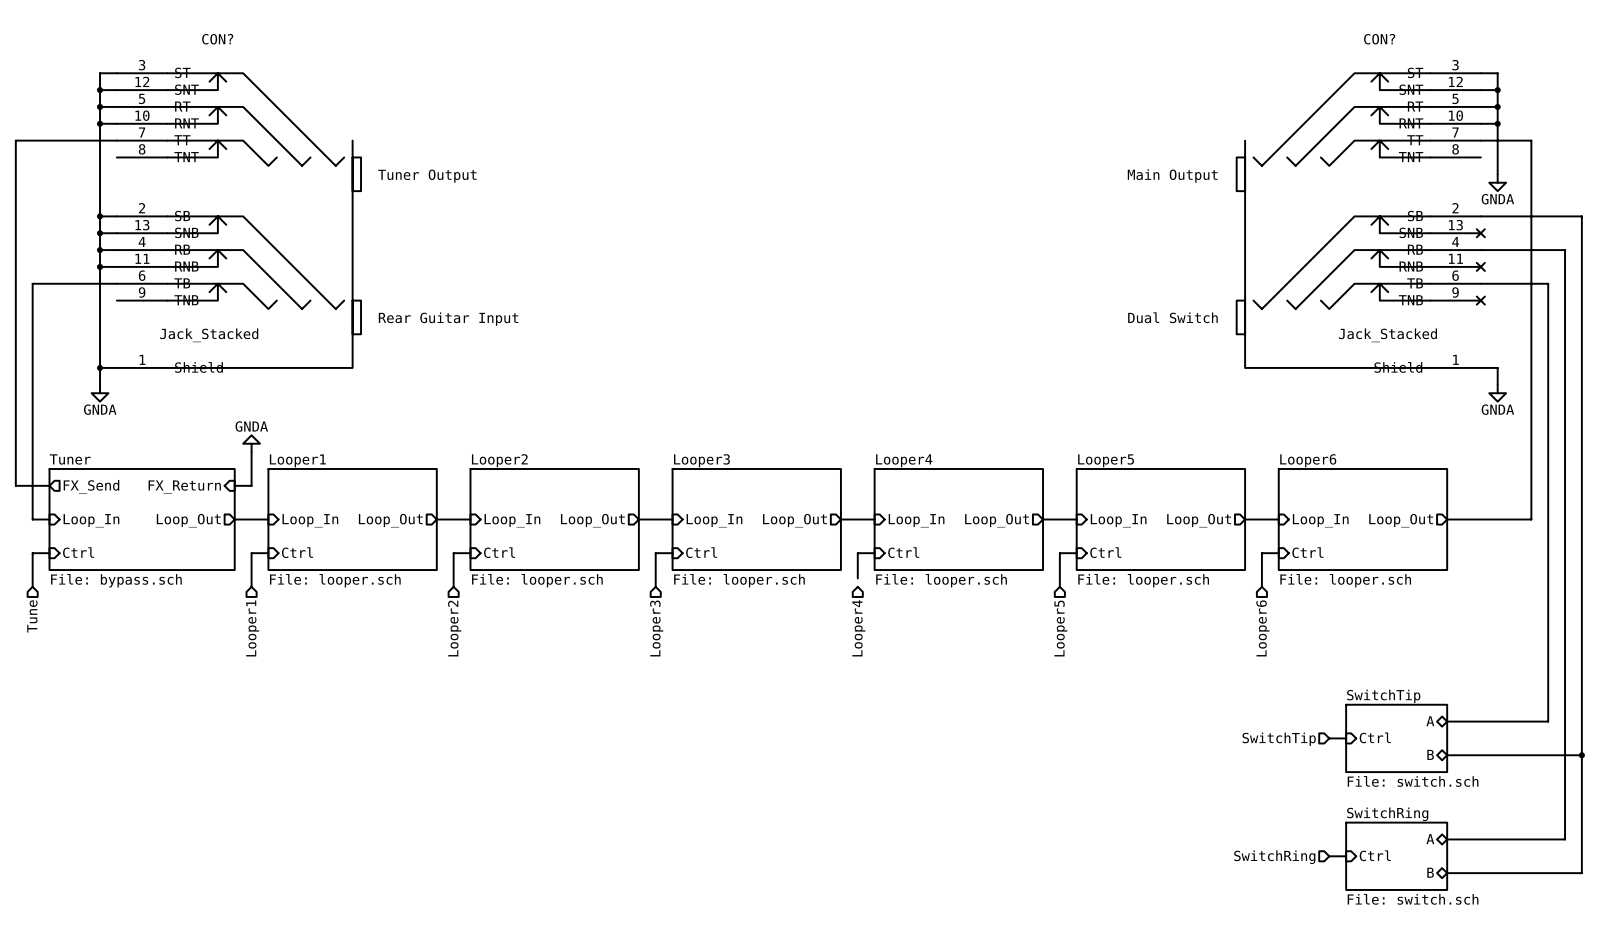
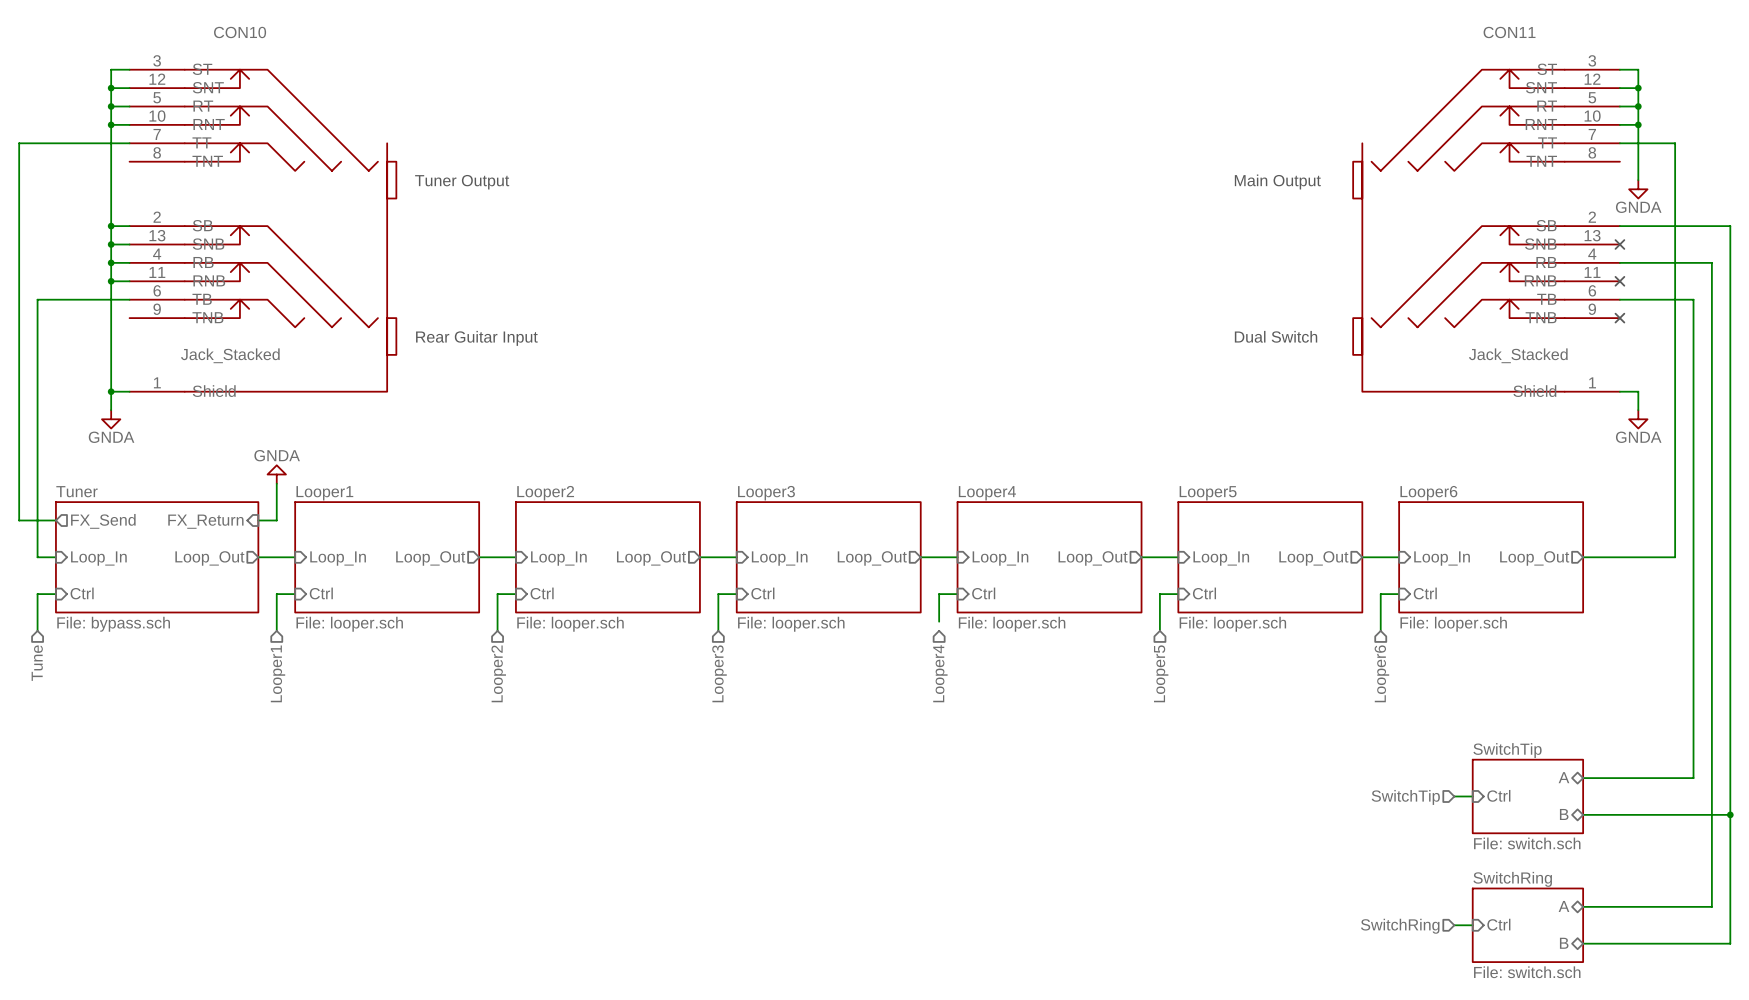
CON? name: CON? (217, 39) -> CON10 (240, 32)
CON? name: CON? (1379, 39) -> CON11 (1509, 32)

